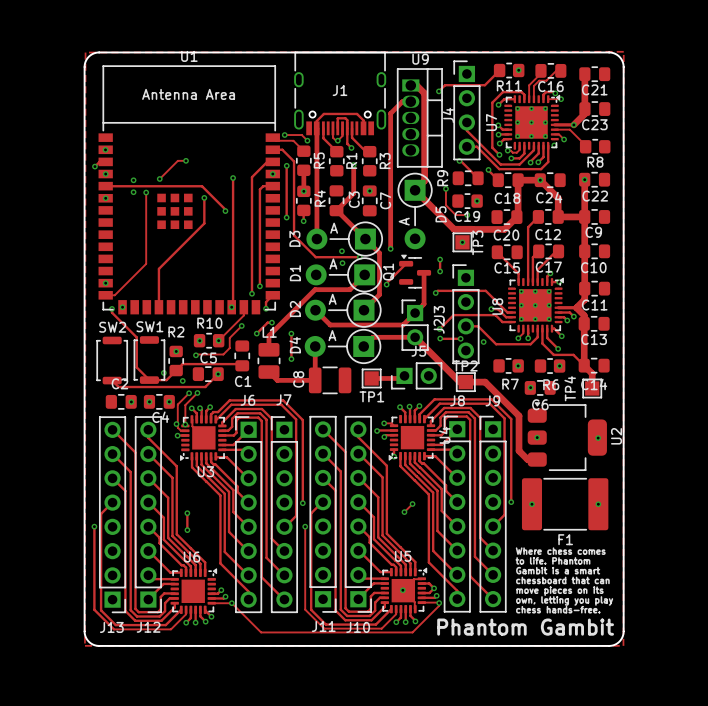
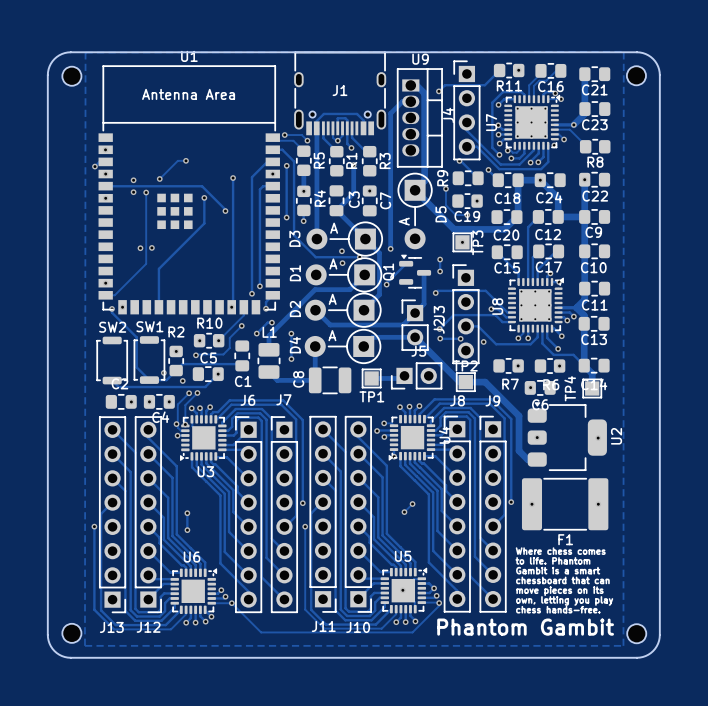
board edge: (99, 52) (609, 52) (620, 57) (623, 67) (623, 631) (618, 642) (609, 645) (99, 645) (87, 640) (84, 631) (84, 67) (88, 56) (99, 52) -> (70, 52) (61, 54) (54, 58) (49, 66) (47, 75) (47, 634) (49, 643) (54, 651) (61, 656) (70, 657) (636, 657) (645, 656) (653, 651) (658, 643) (659, 634) (659, 75) (658, 66) (653, 58) (645, 54) (636, 52) (70, 52)
part: none -> (636, 75)
part: none -> (71, 76)
via: none -> (151, 247)
via: none -> (140, 248)
part: none -> (71, 633)
part: none -> (636, 633)

